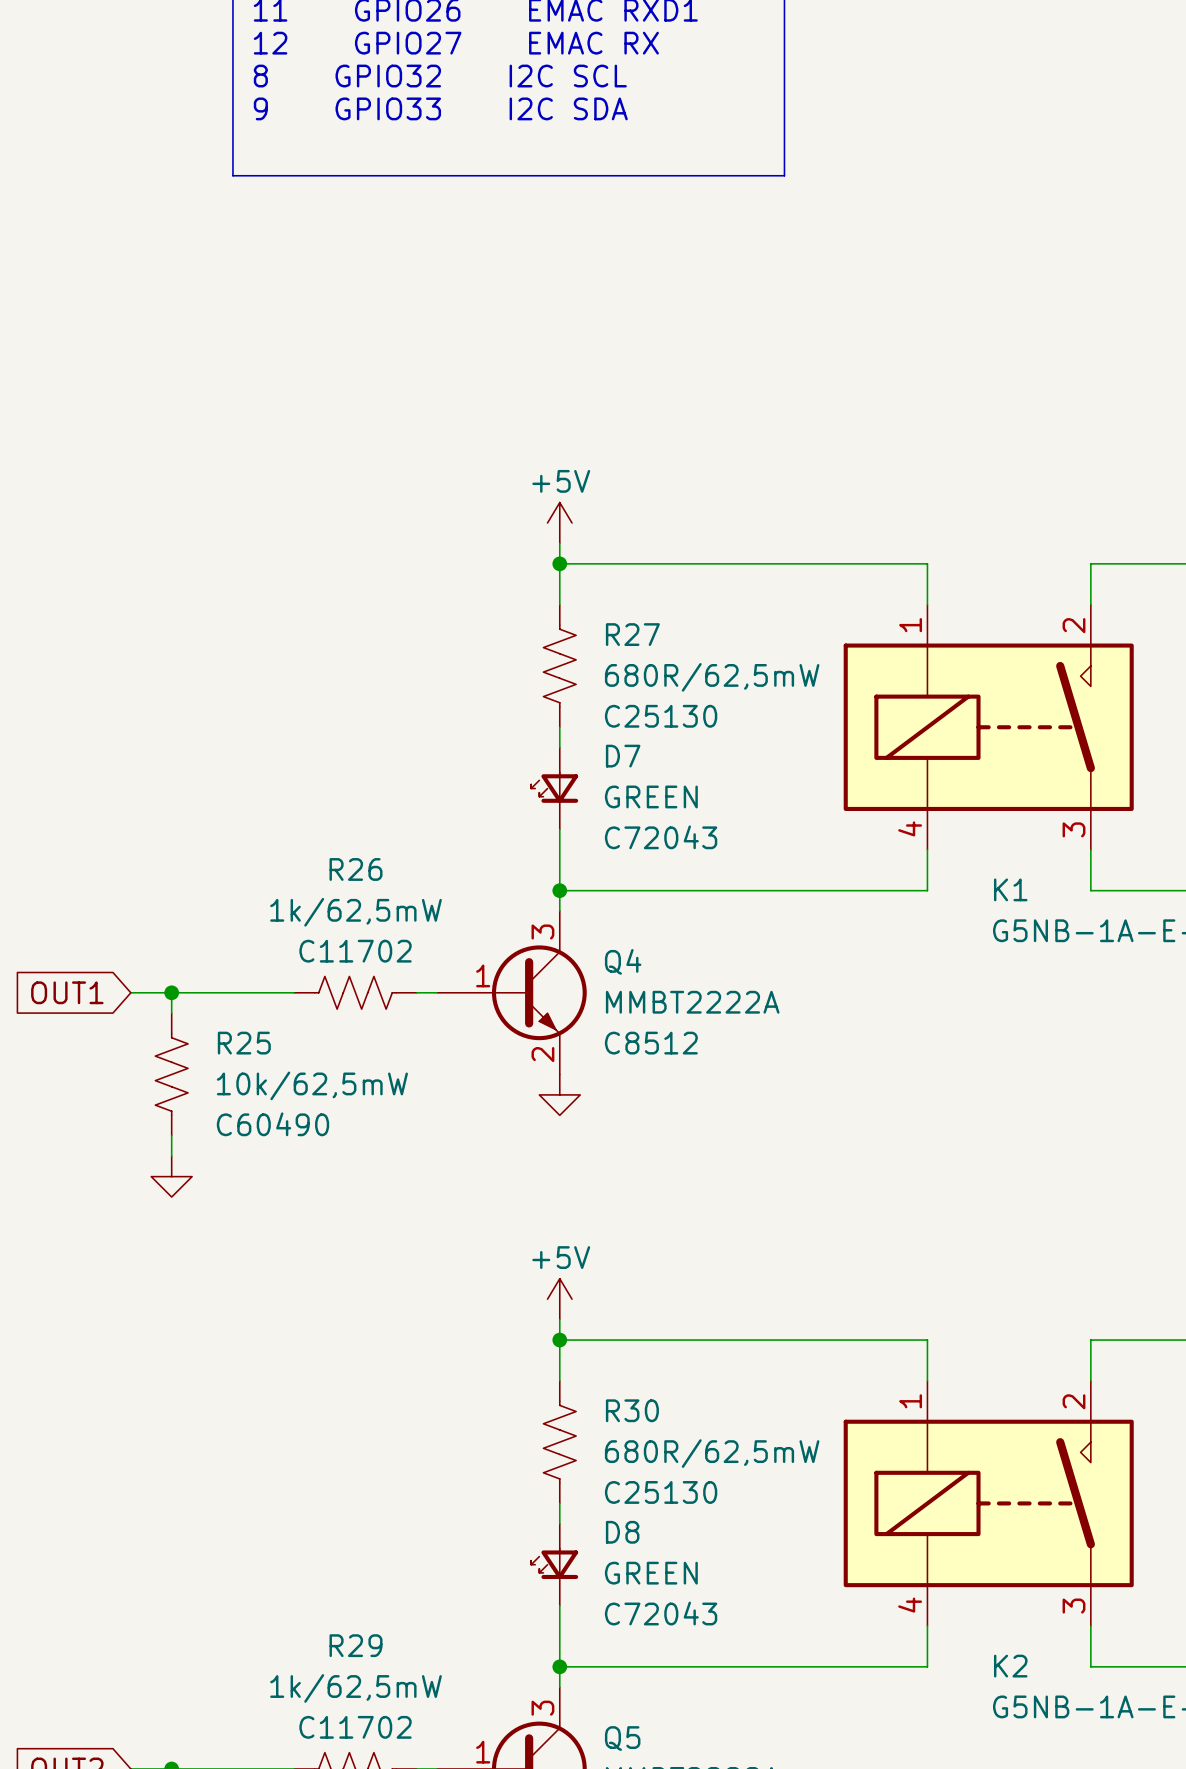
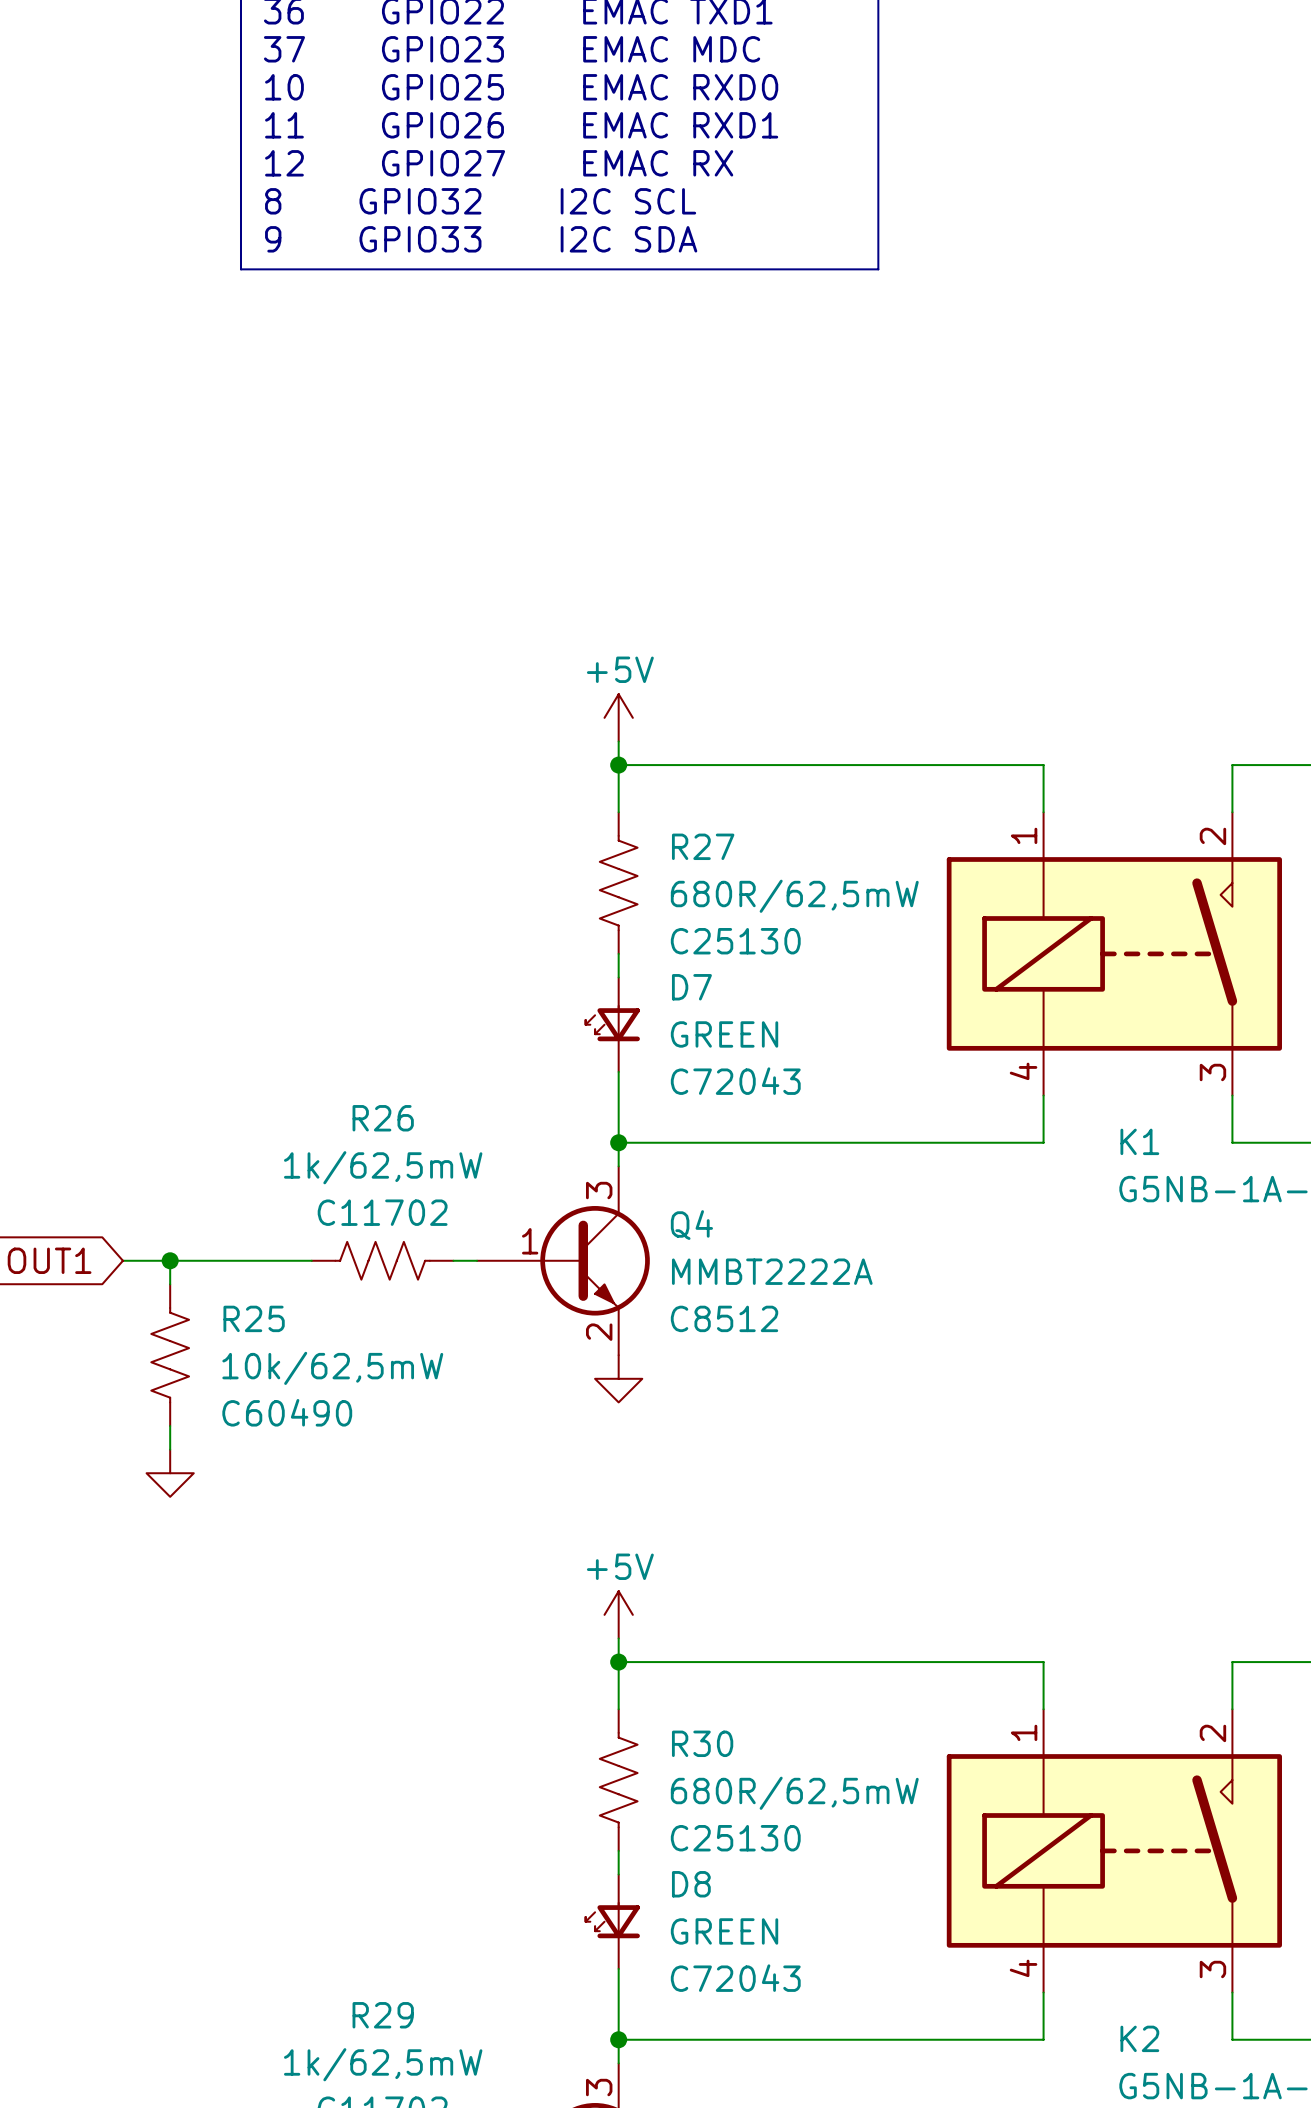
line: (232, 134) (232, 175) (784, 175) (784, 134) -> (240, 269) (878, 269)

